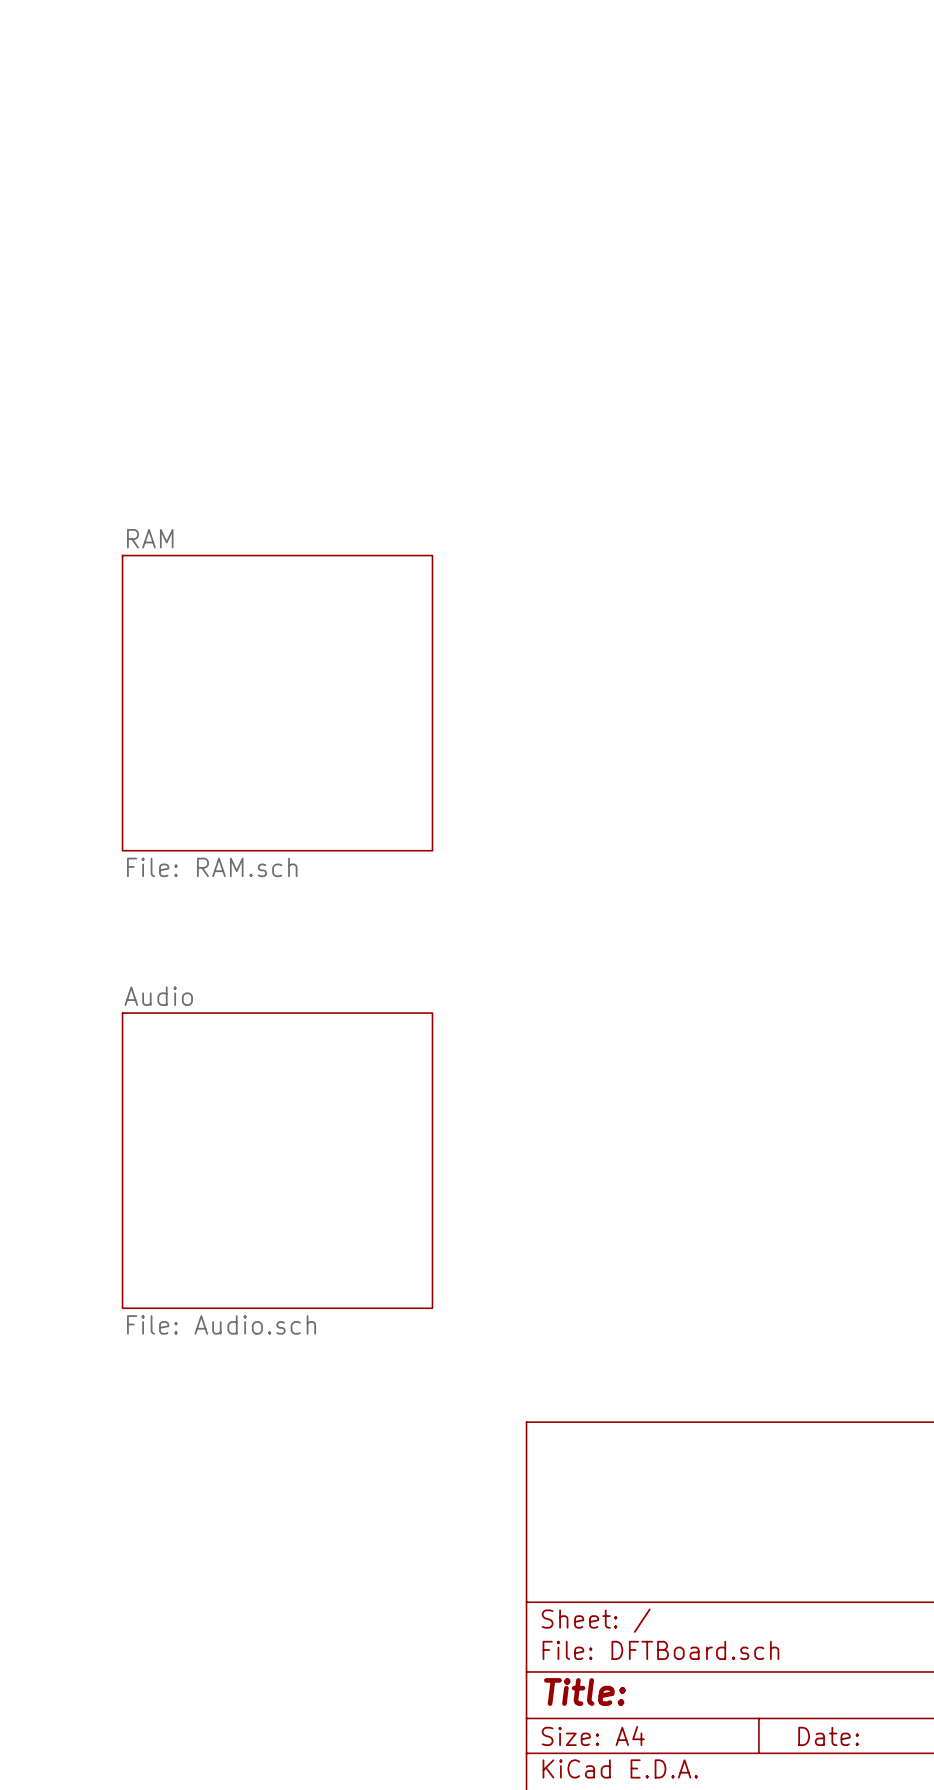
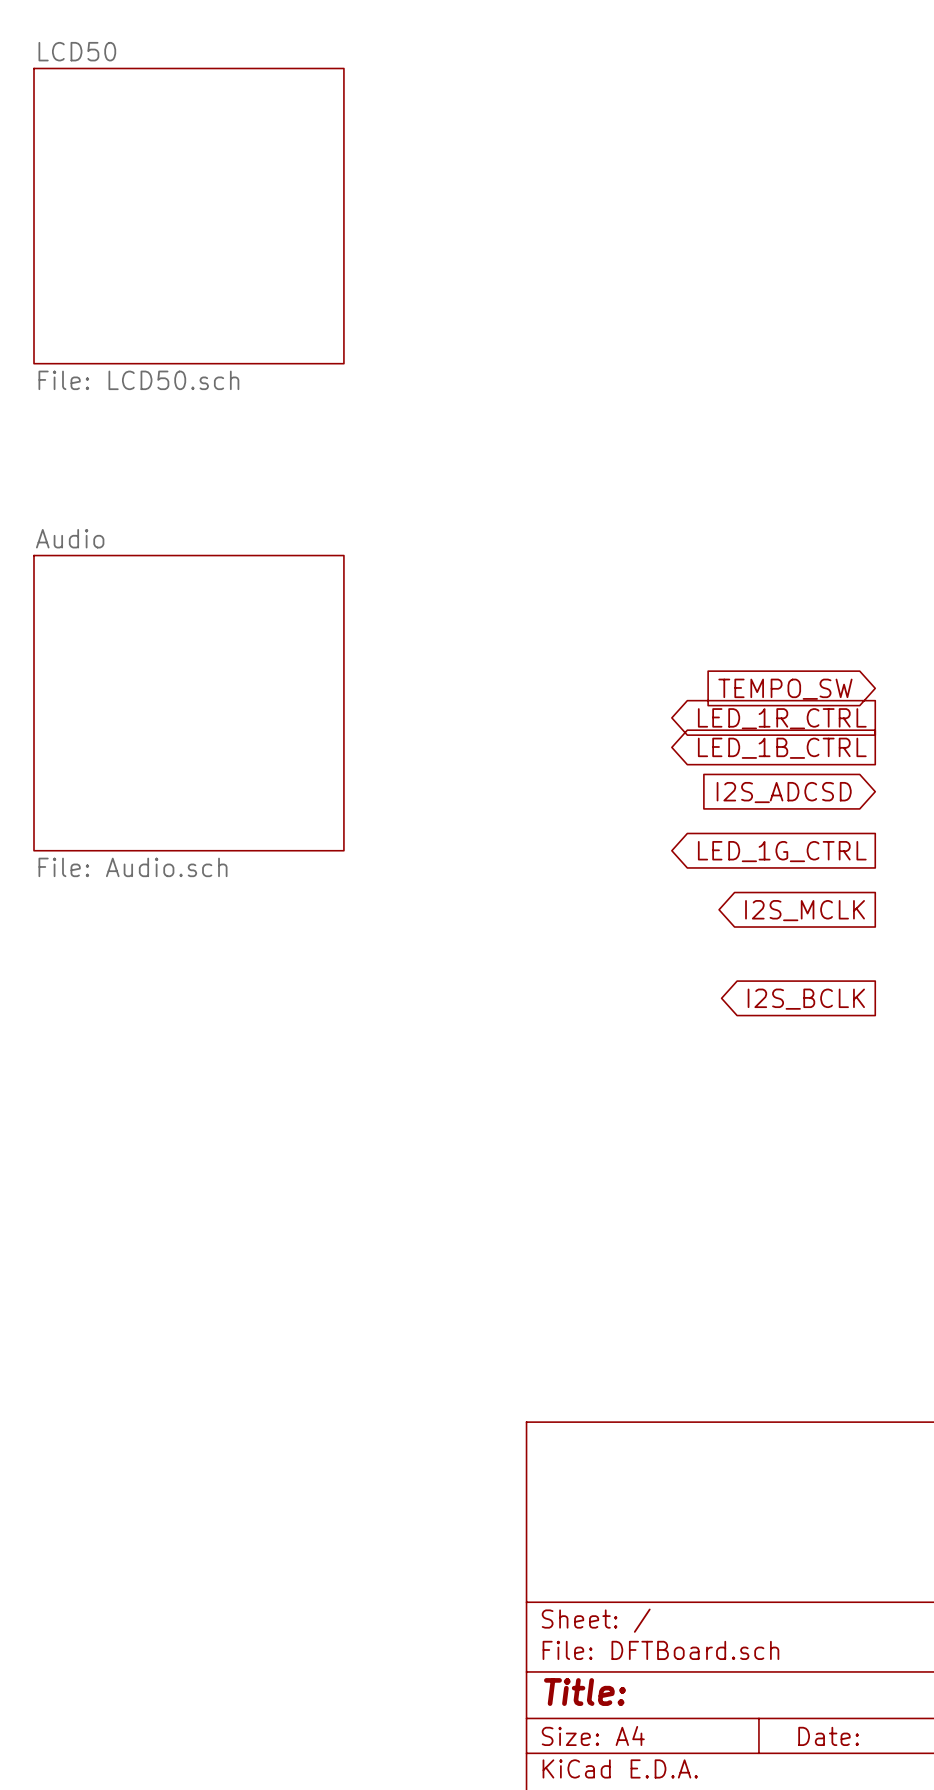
sheet LCD50: none -> File: LCD50.sch (188, 216)
global label: none -> TEMPO_SW (785, 689)
sheet Audio: none -> File: Audio.sch (188, 703)
sheet RAM: File: RAM.sch (277, 703) -> none
global label: none -> LED_1R_CTRL (782, 718)
global label: none -> LED_1B_CTRL (782, 748)
global label: none -> I2S_ADCSD (784, 792)
global label: none -> LED_1G_CTRL (782, 851)
global label: none -> I2S_MCLK (805, 910)
global label: none -> I2S_BCLK (806, 999)
sheet Audio: File: Audio.sch (277, 1160) -> none

